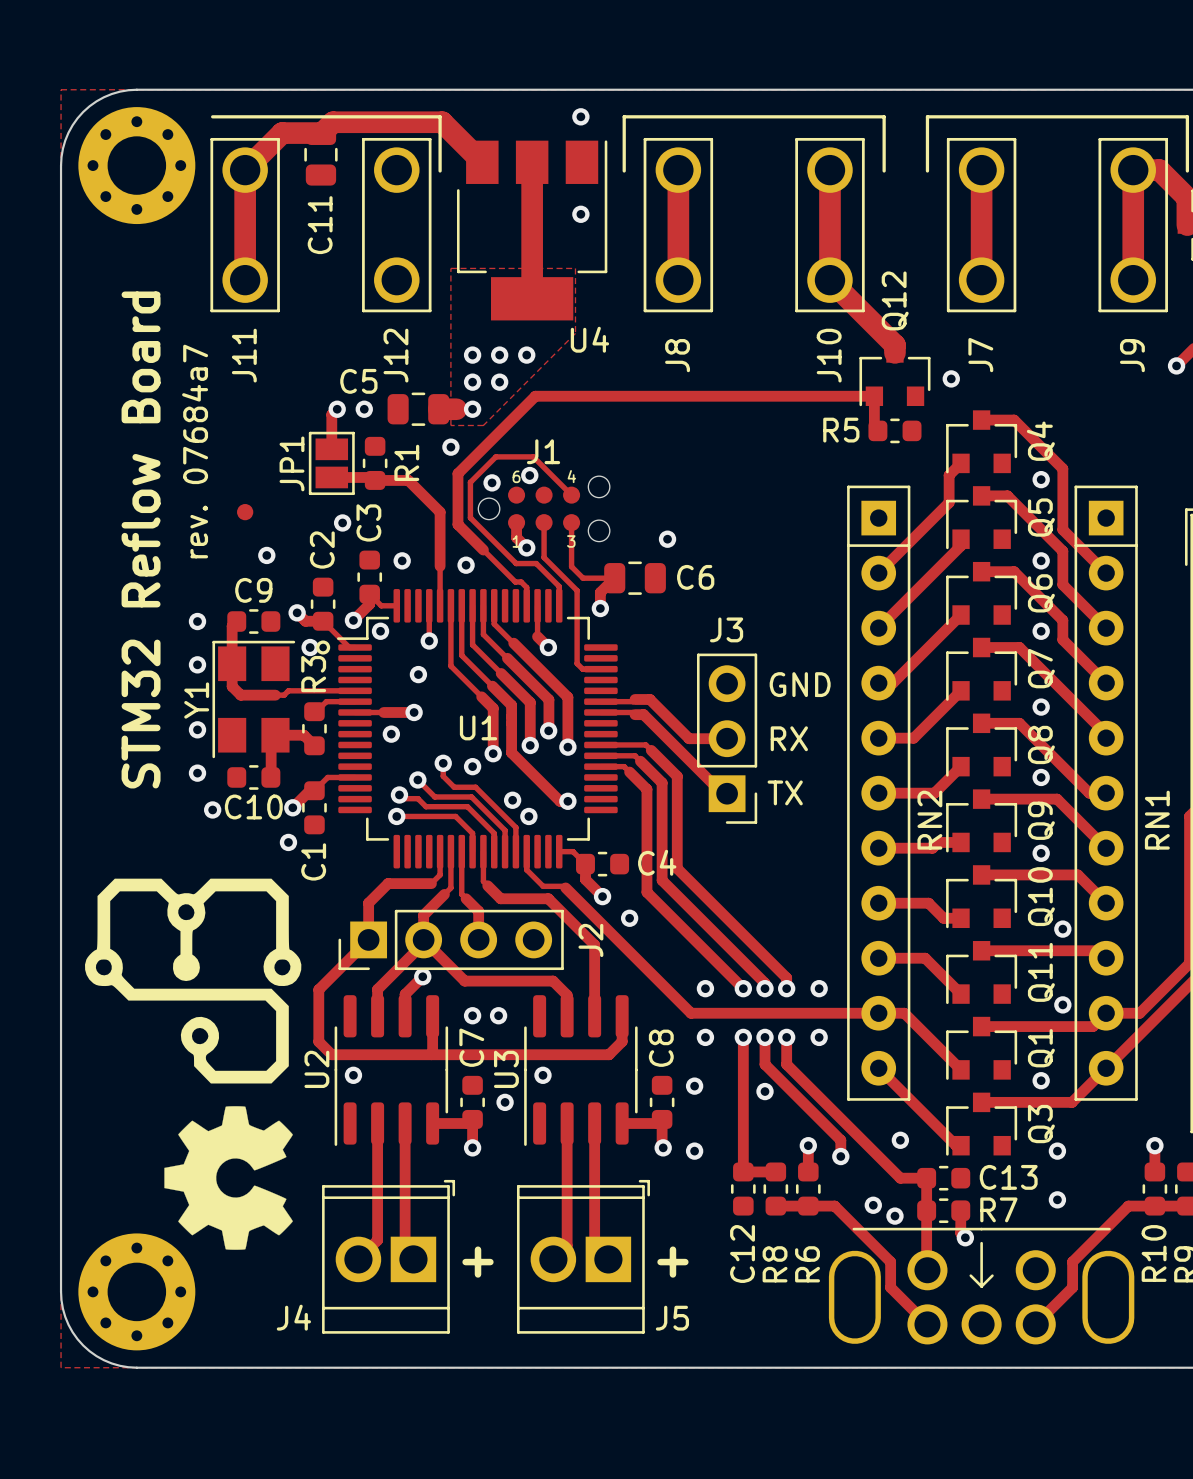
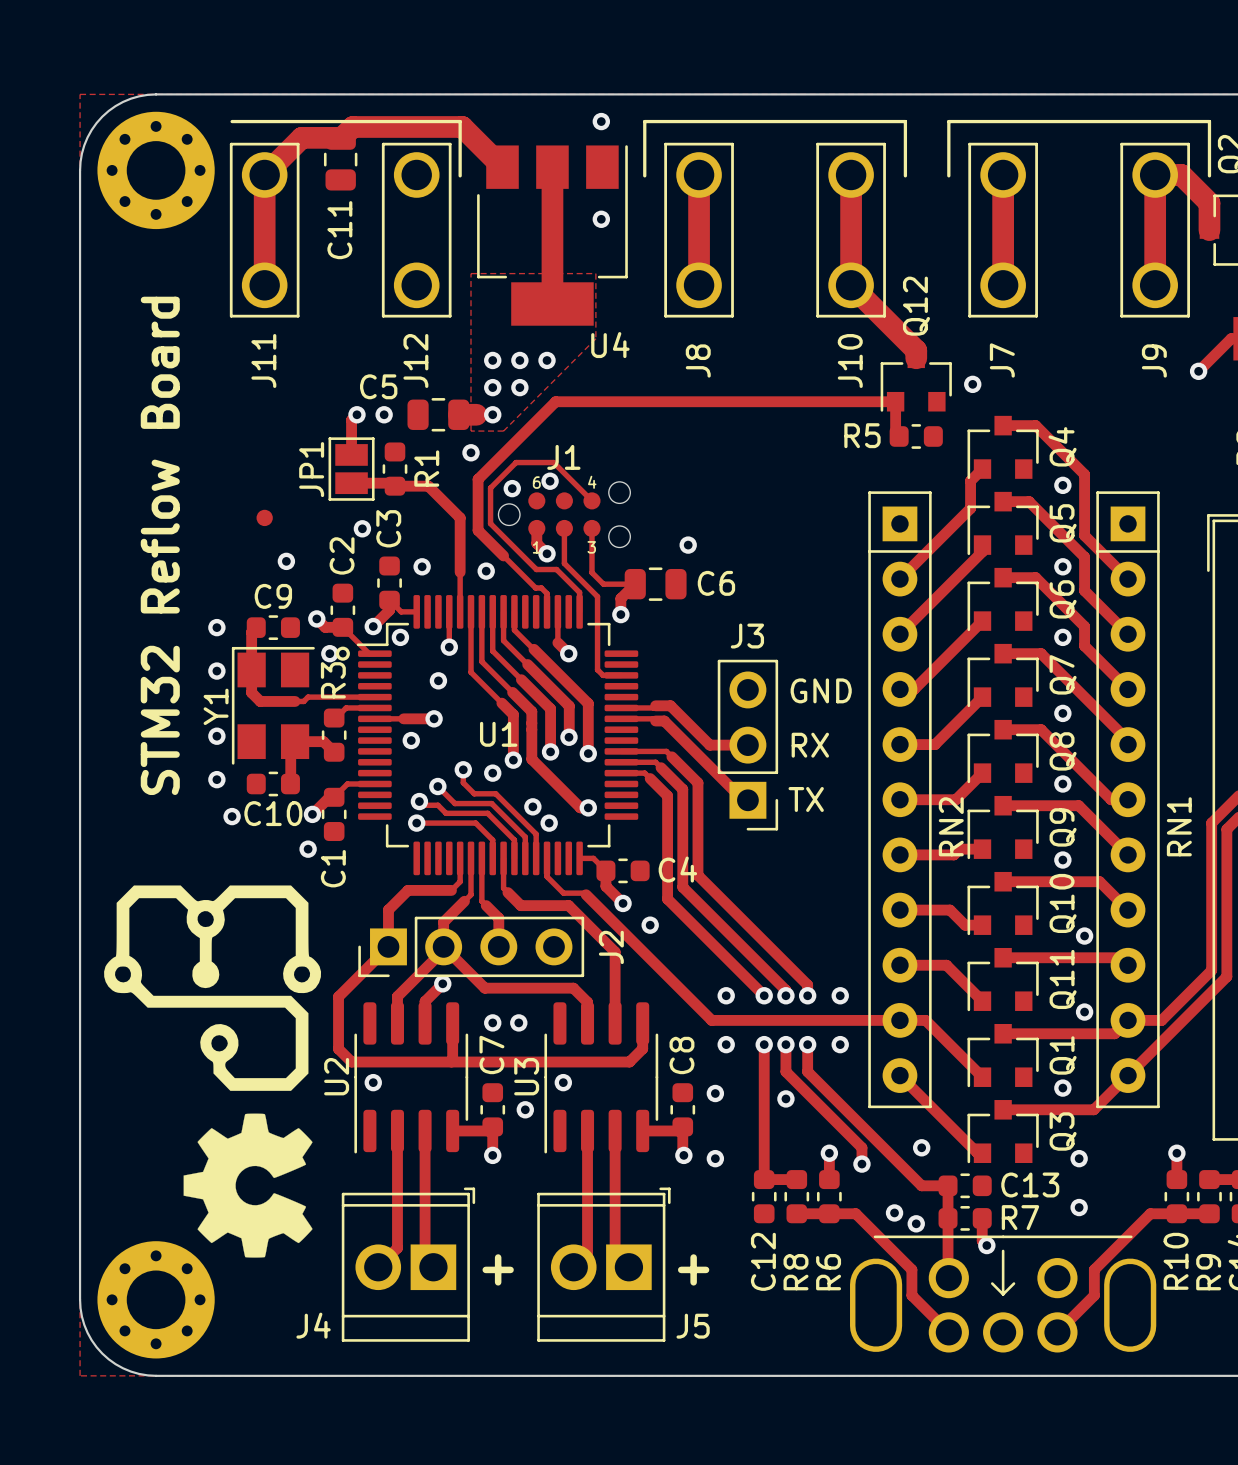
text: rev. 07684a7 (195, 451) -> none

